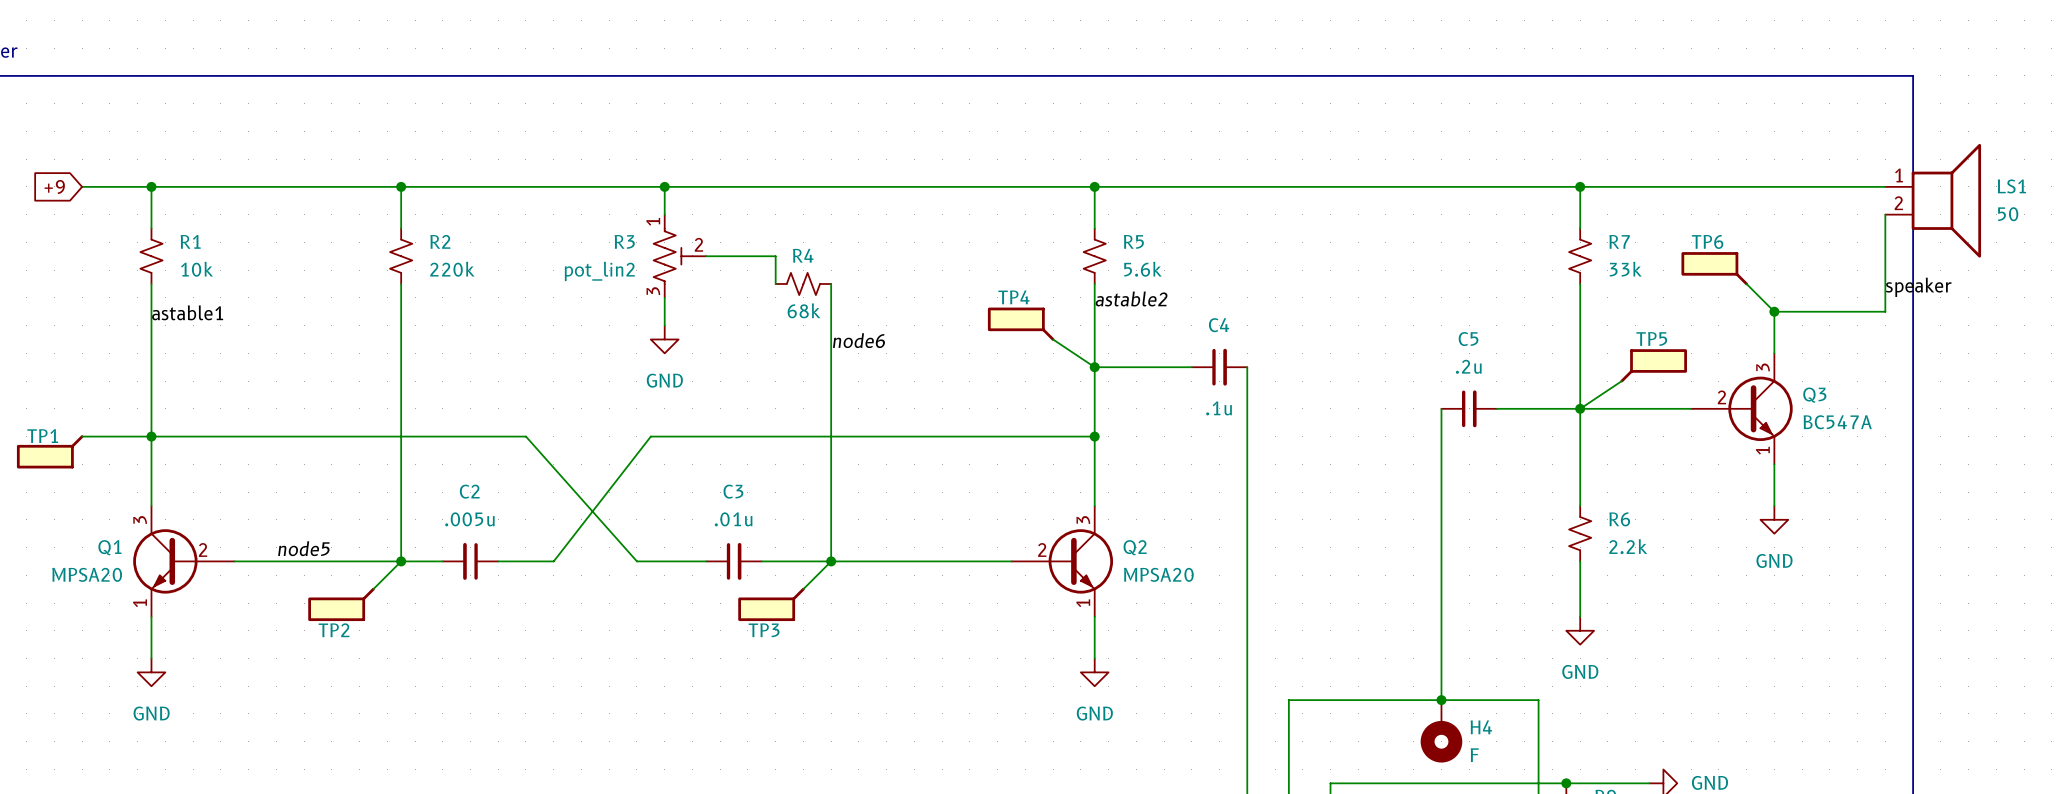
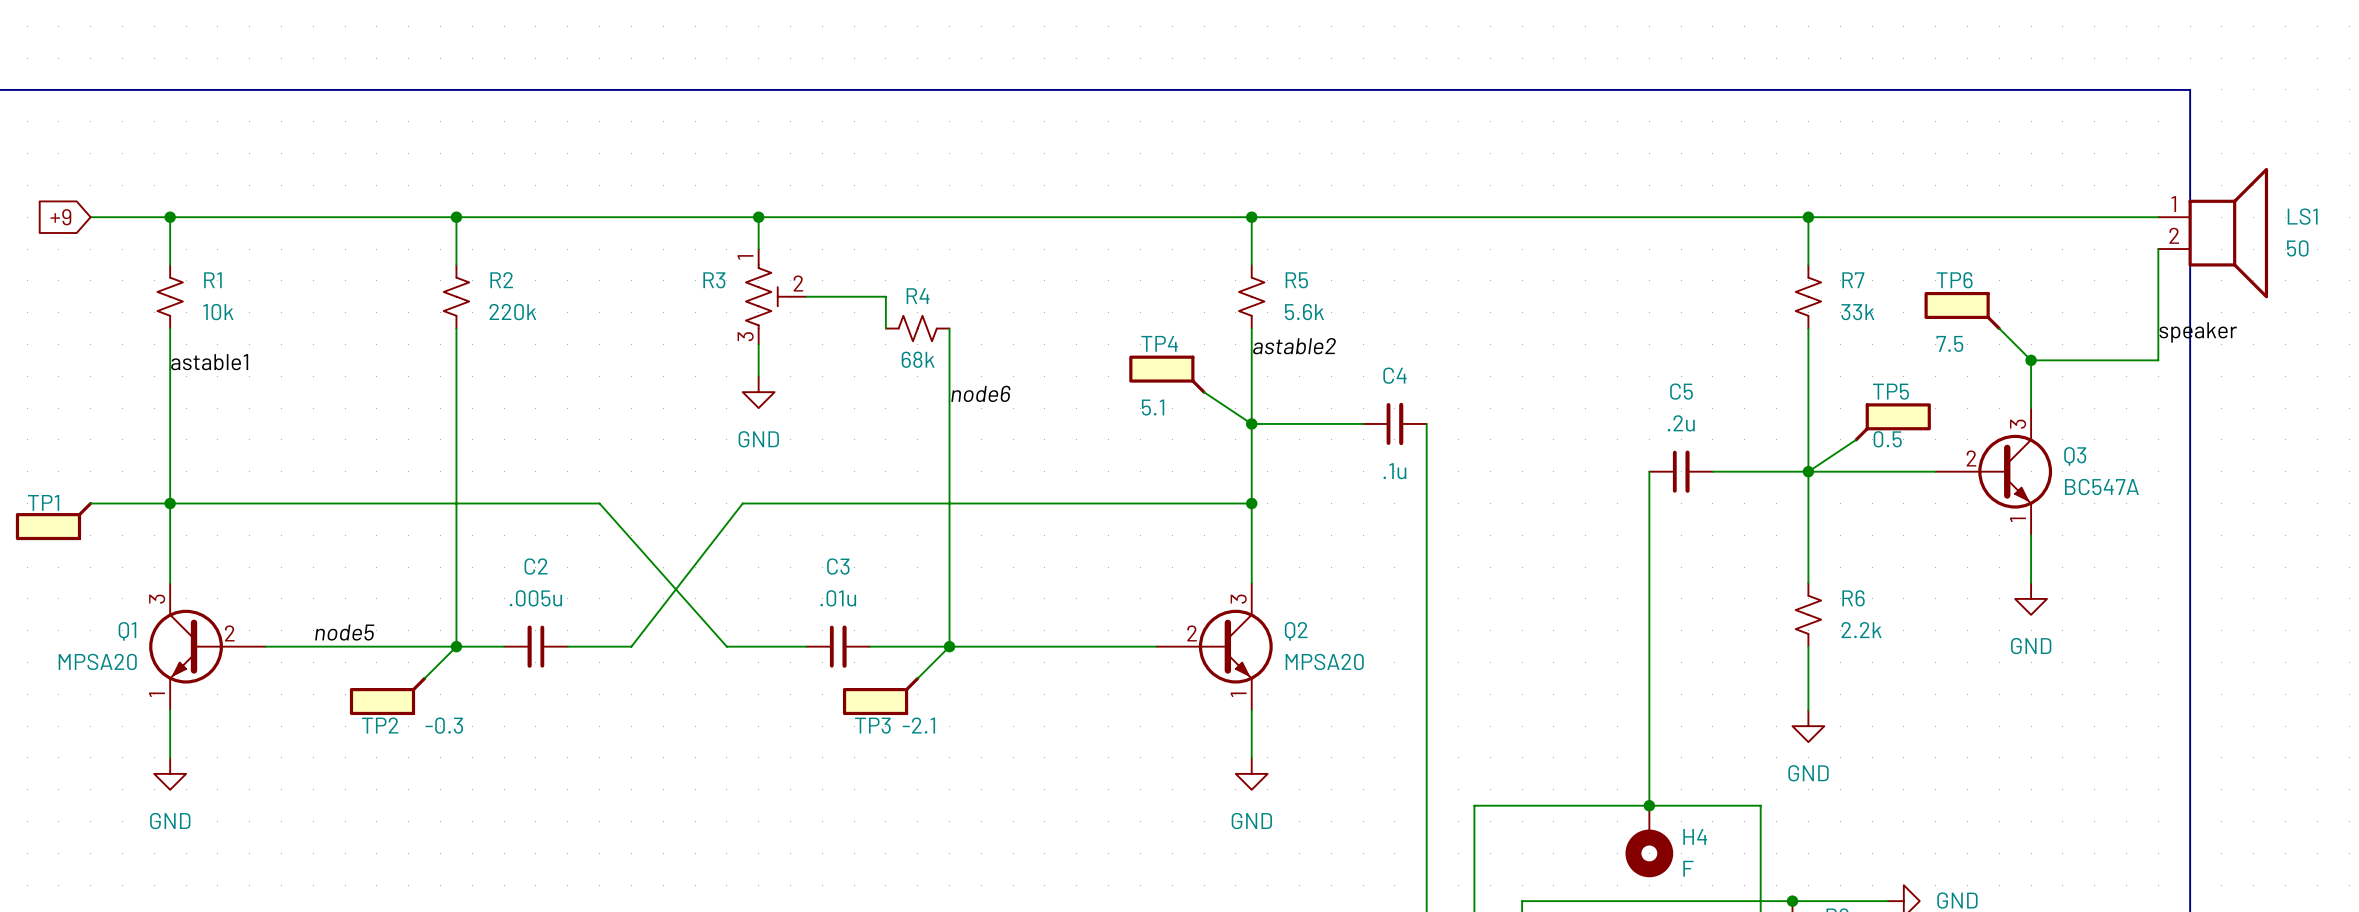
R3 value: pot_lin2 (599, 271) -> none
TP6 value: none -> 7.5 (1949, 343)
TP4 value: none -> 5.1 (1153, 407)
TP5 value: none -> 0.5 (1887, 439)
TP2 value: none -> -0.3 (444, 725)
TP3 value: none -> -2.1 (918, 725)

